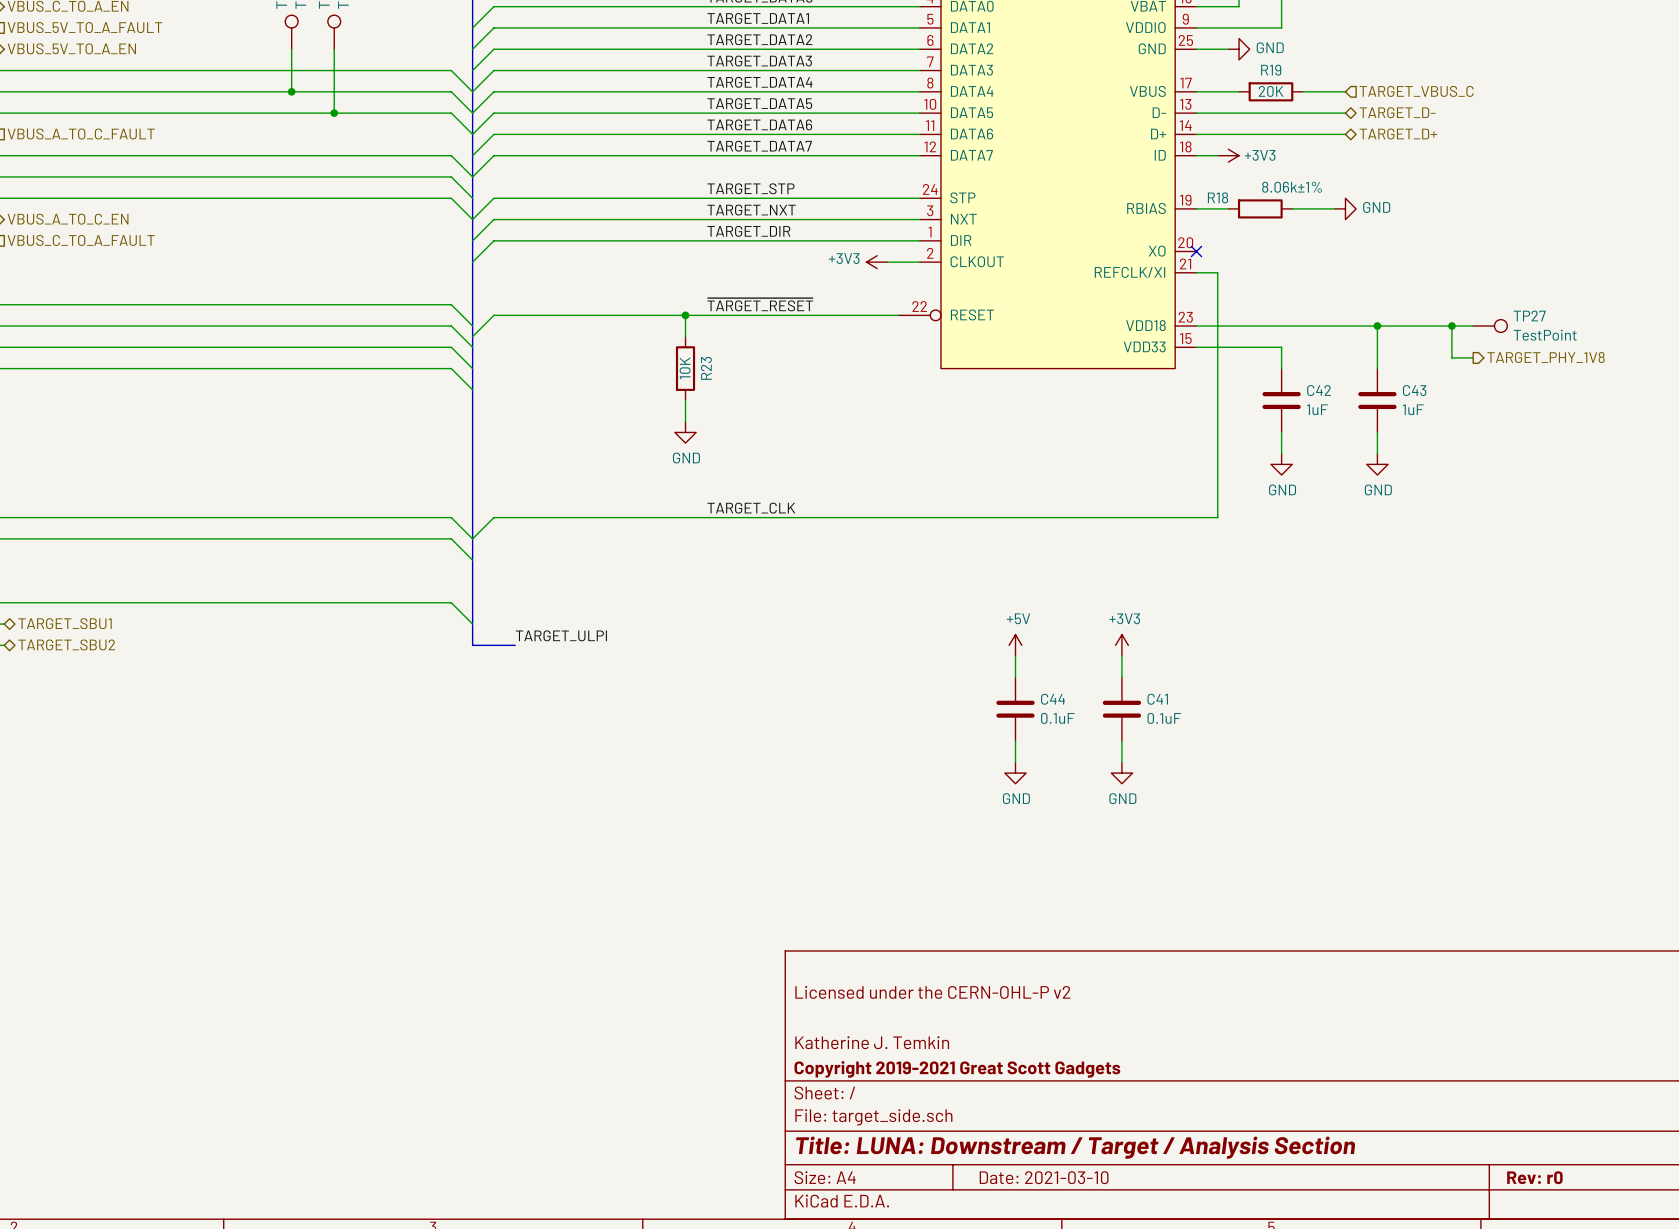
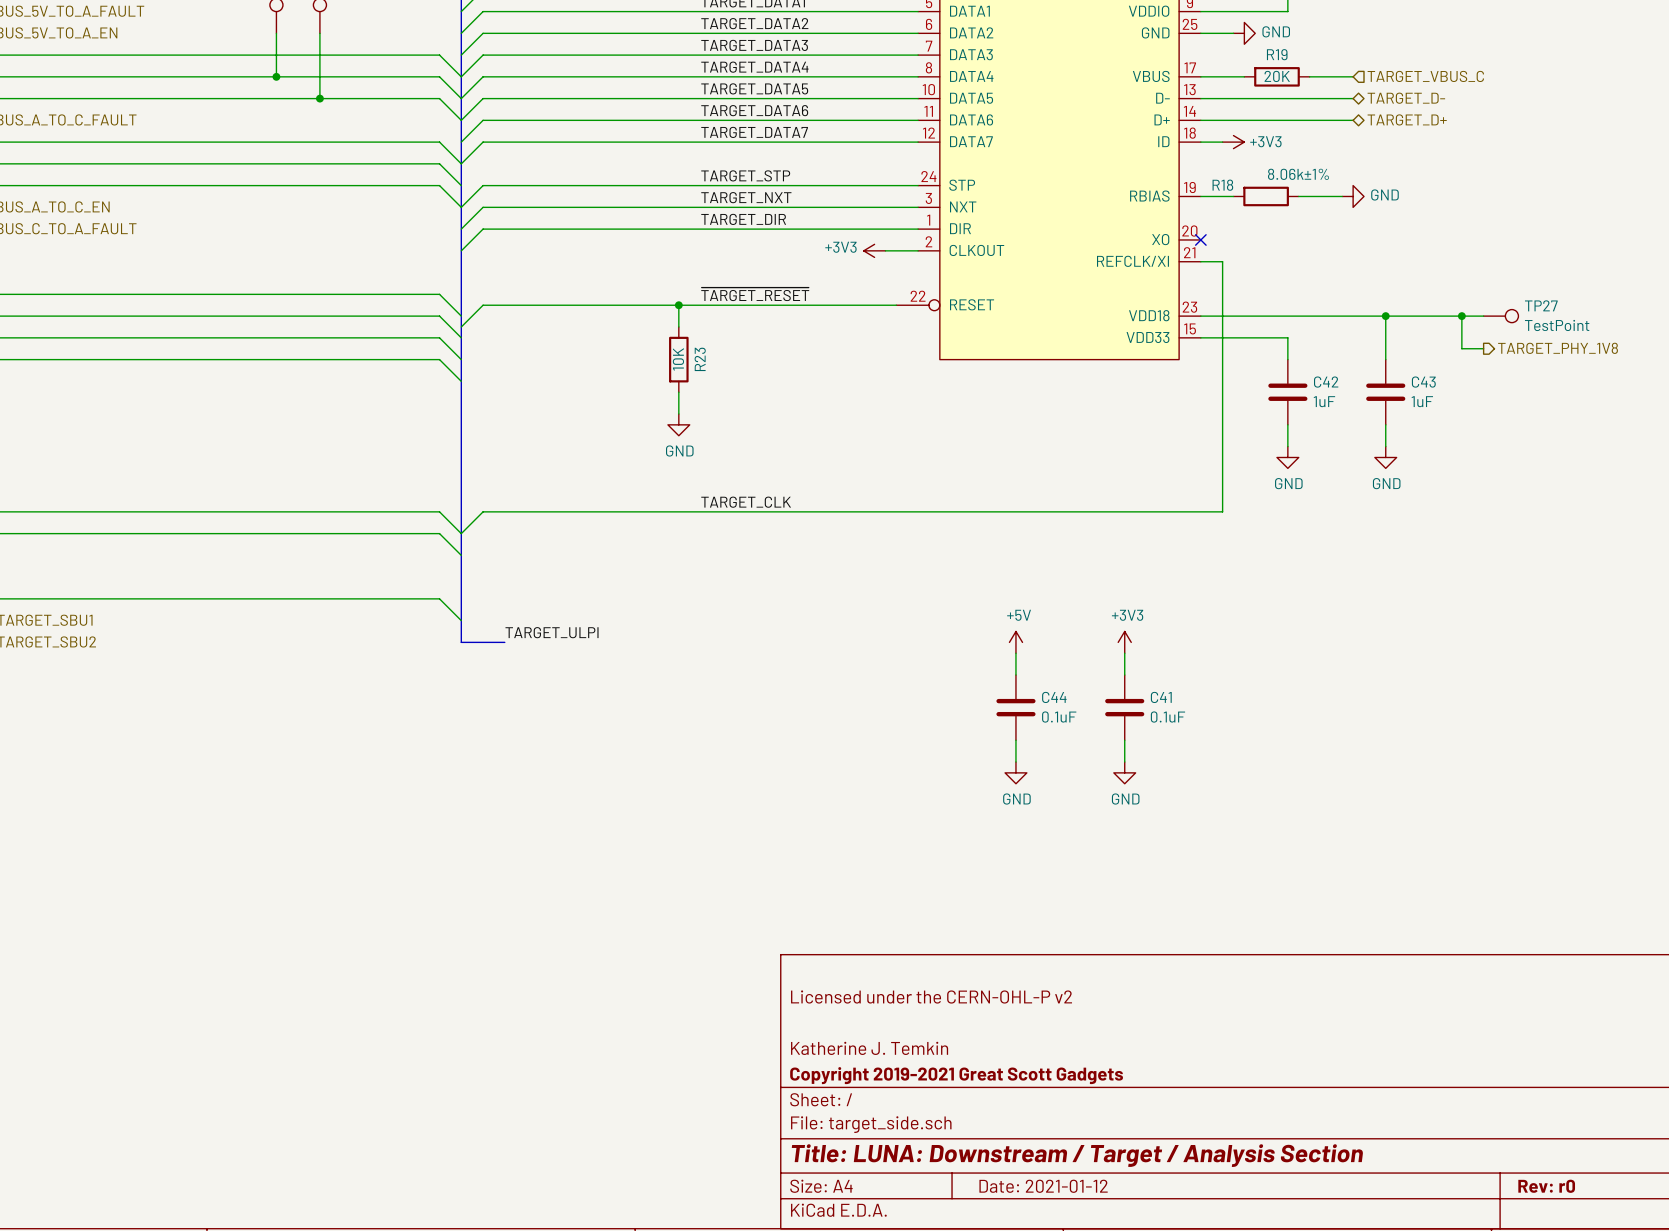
title block: Date: 2021-03-10 (1044, 1177) -> Date: 2021-01-12 (1043, 1186)

